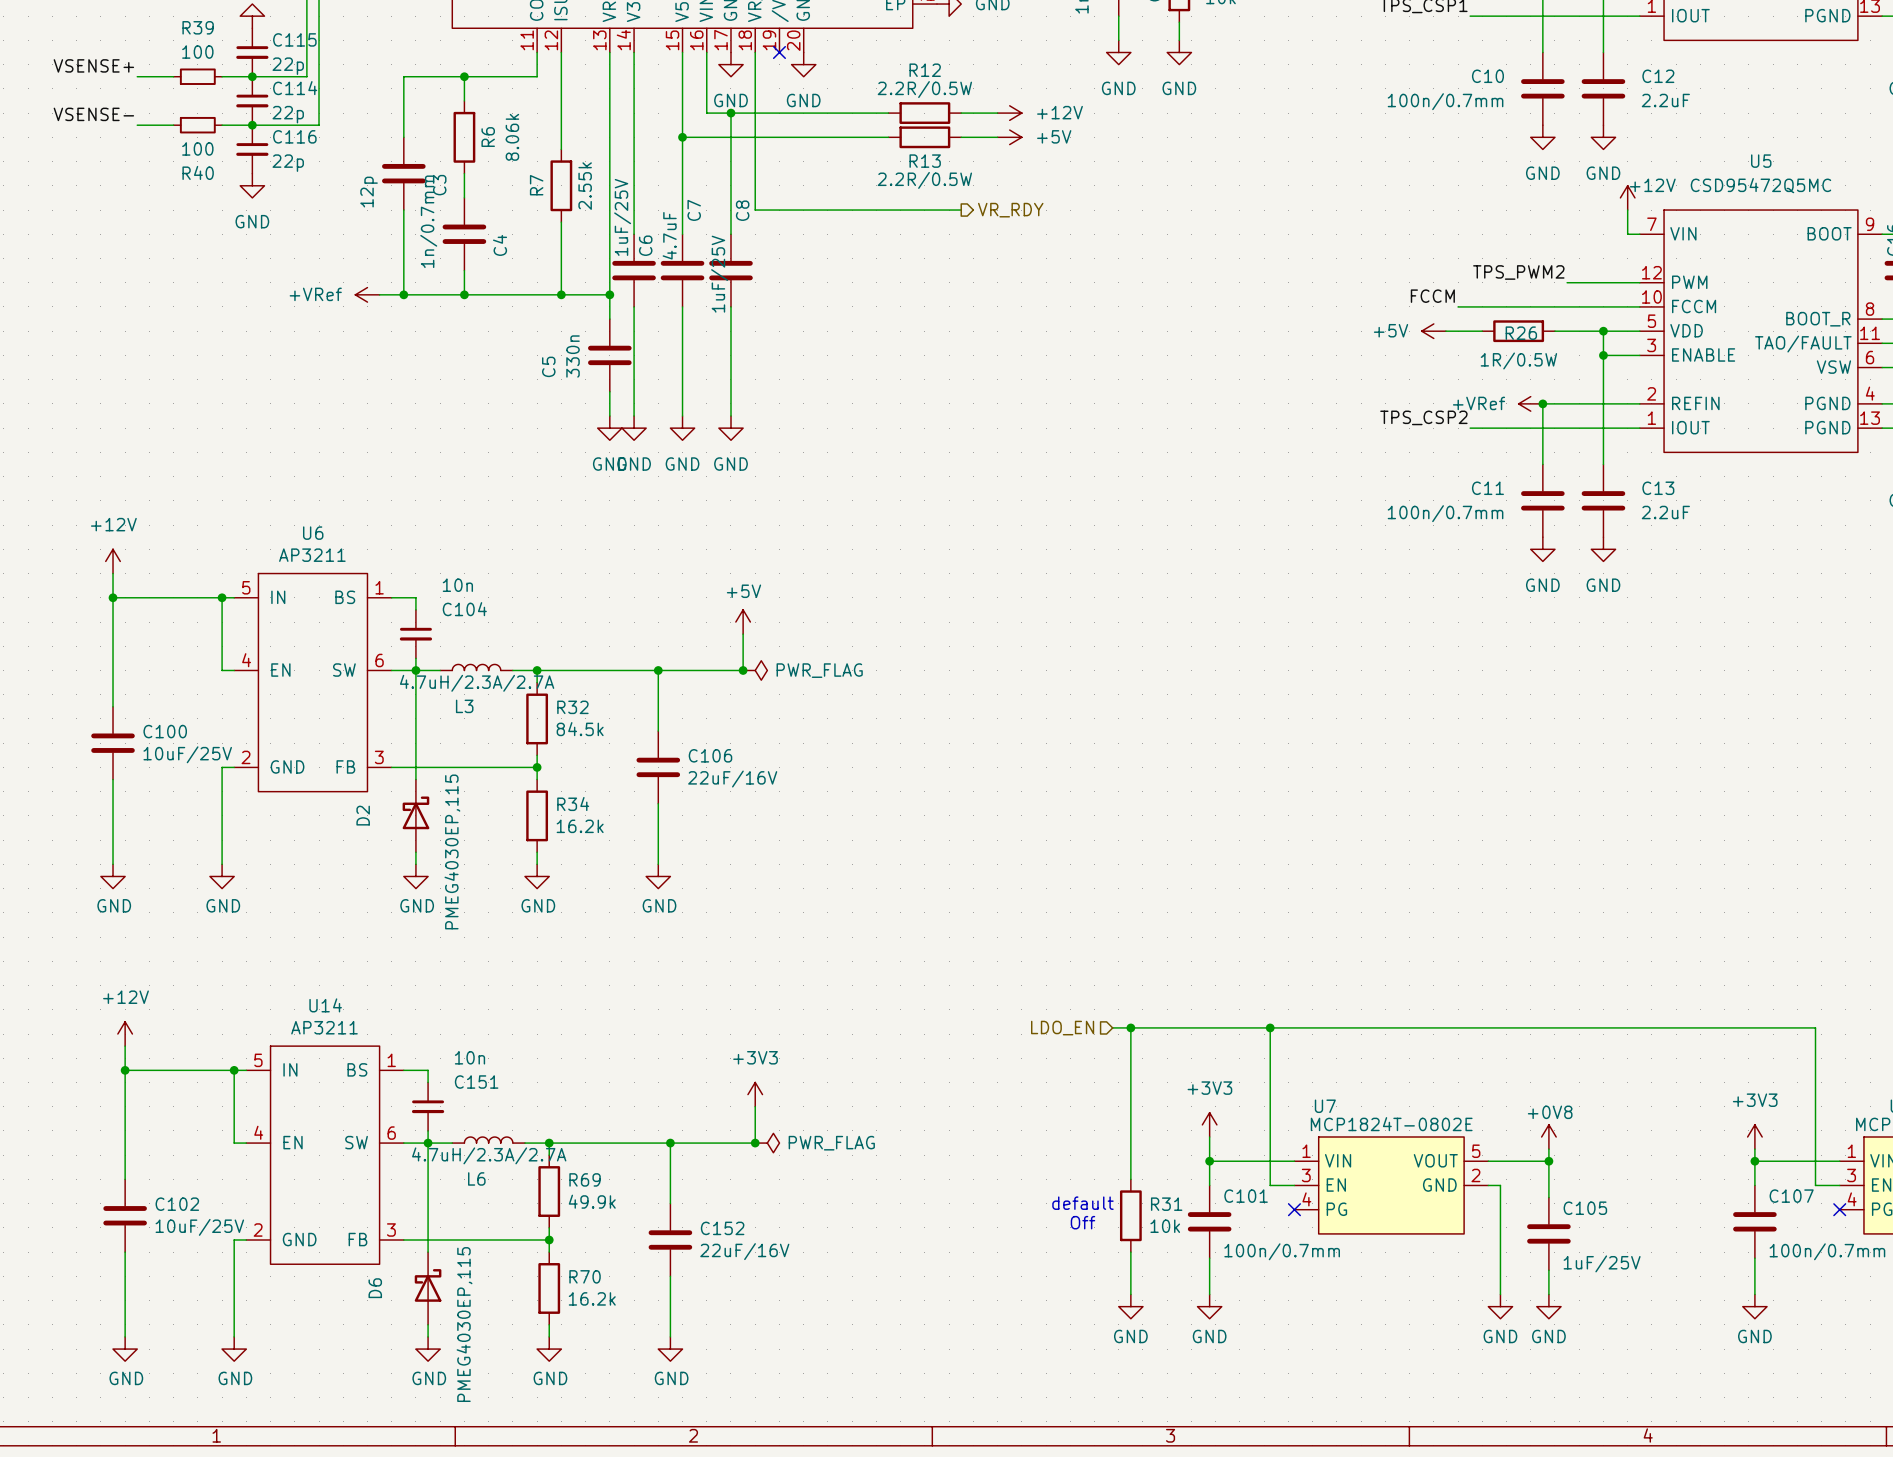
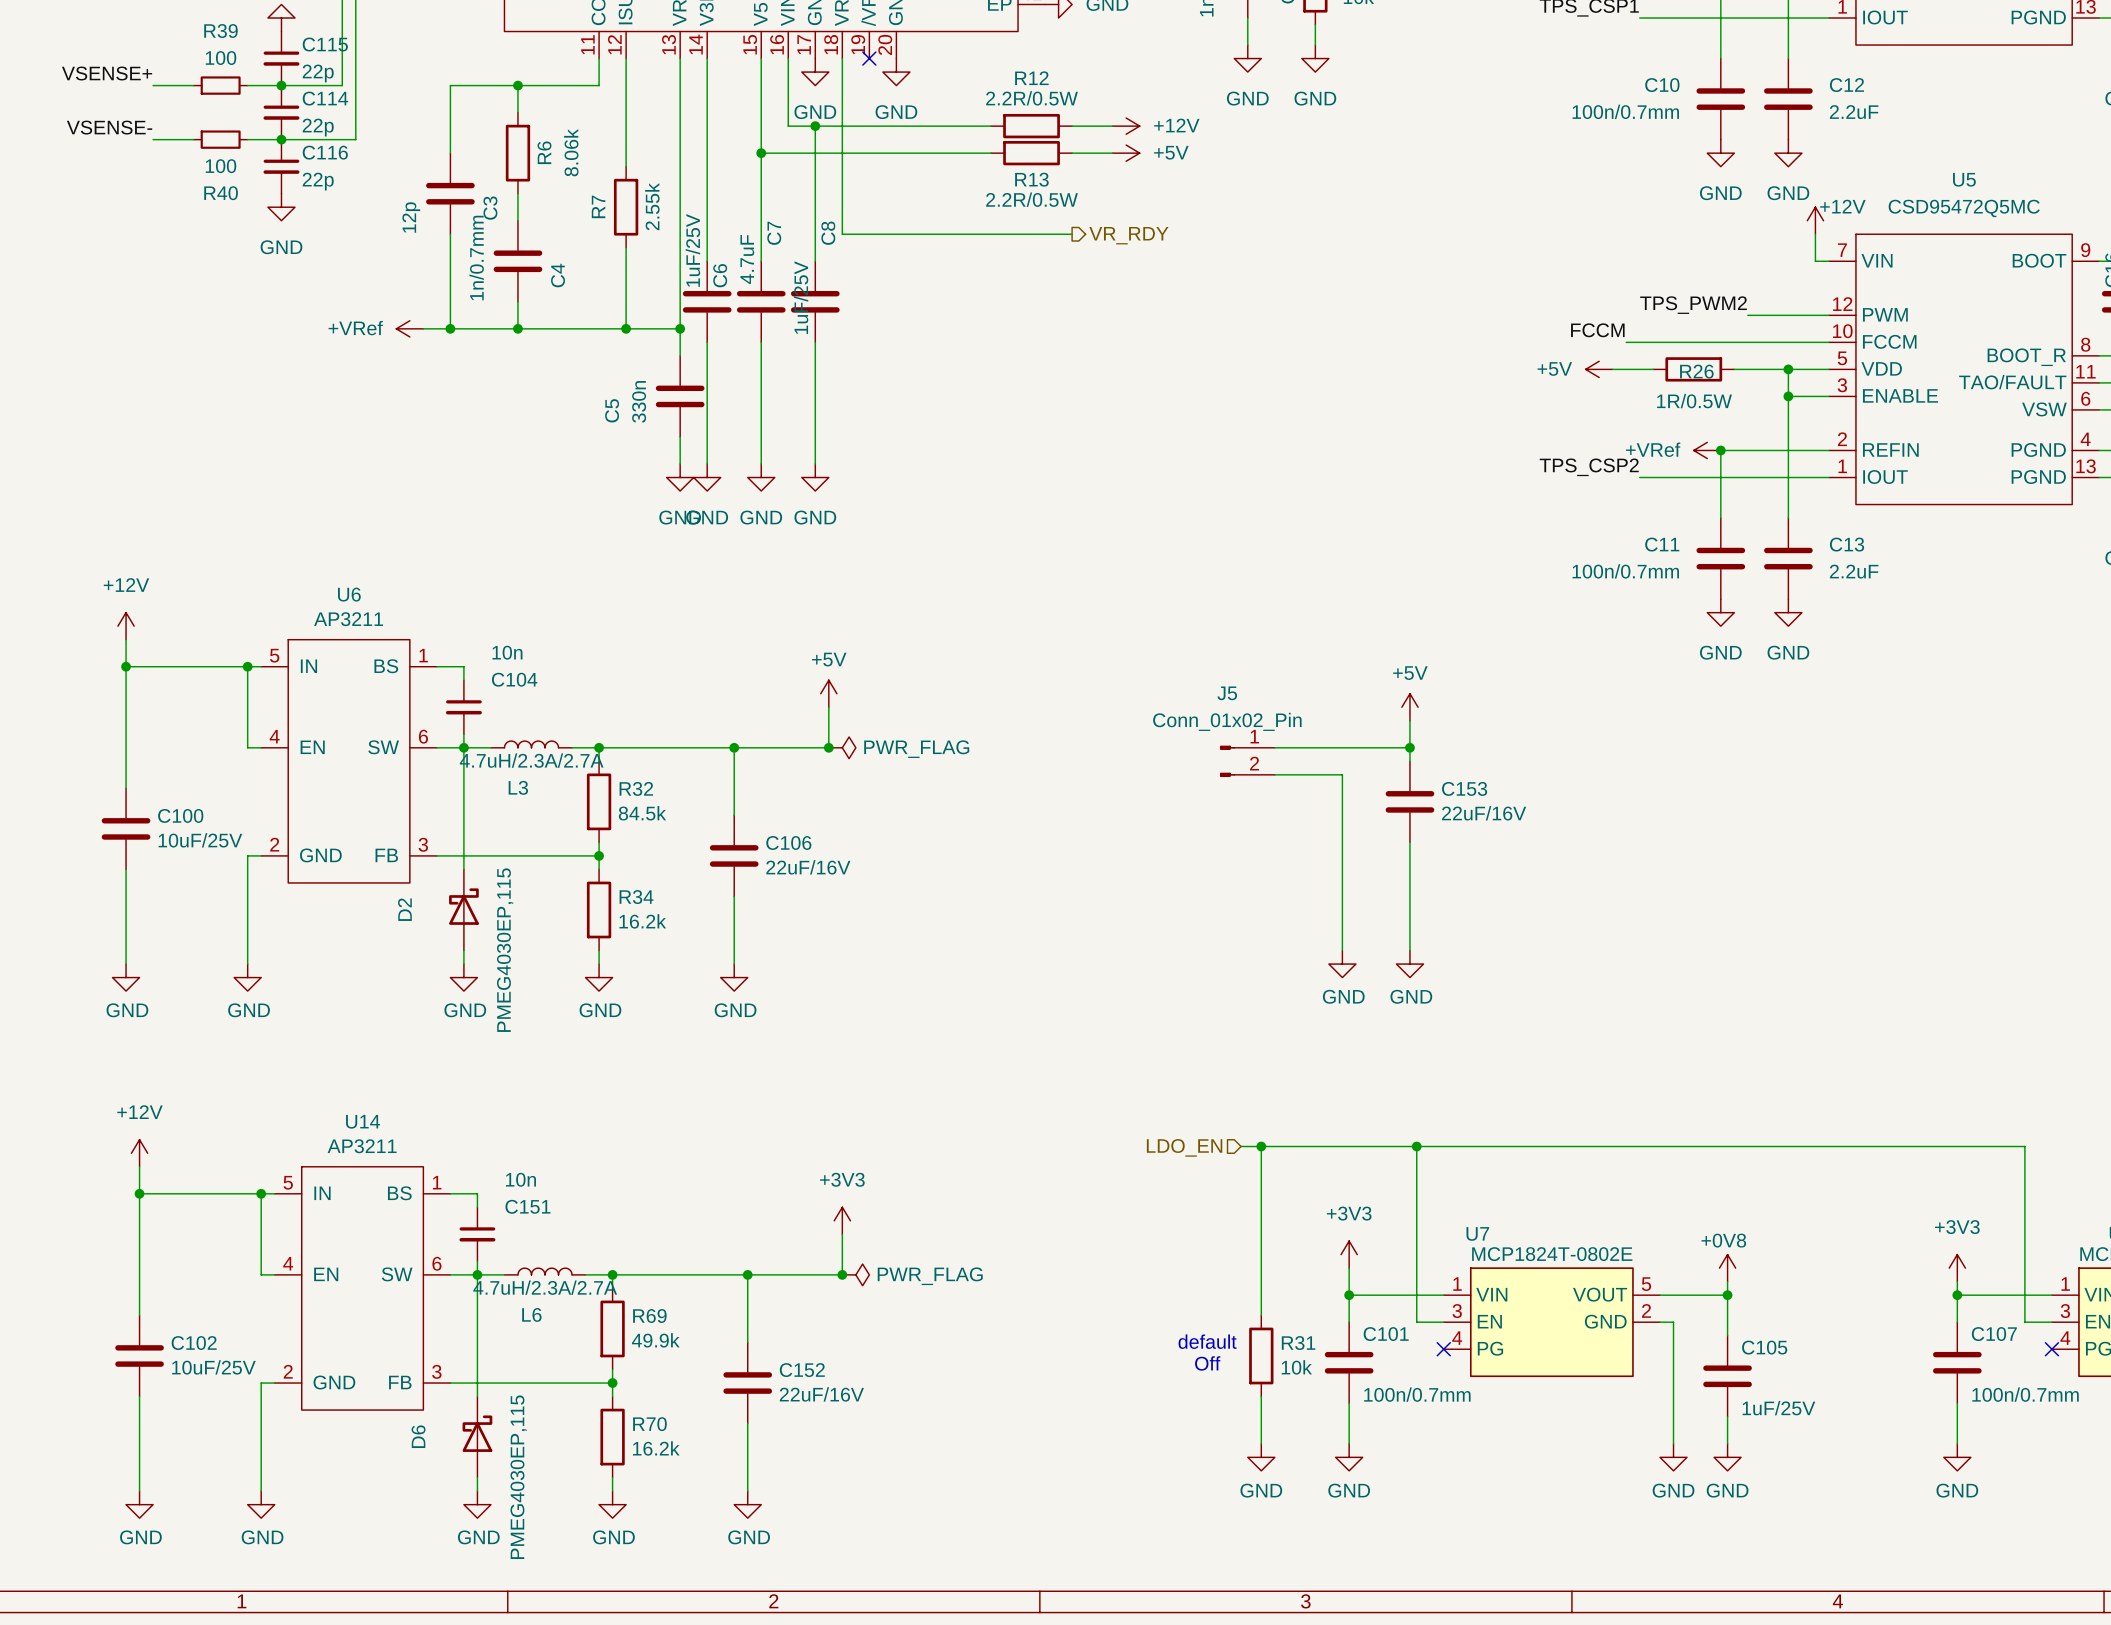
power symbol: none -> +5V (1409, 707)
wire: none -> (1409, 720) (1409, 761)
wire: none -> (1274, 747) (1409, 747)
junction: none -> (1409, 747)
J5: none -> Conn_01x02_Pin (1247, 761)
wire: none -> (1274, 774) (1342, 774) (1342, 950)
C153: none -> 22uF/16V (1409, 801)
wire: none -> (1409, 842) (1409, 950)
power symbol: none -> GND (1342, 964)
power symbol: none -> GND (1409, 964)

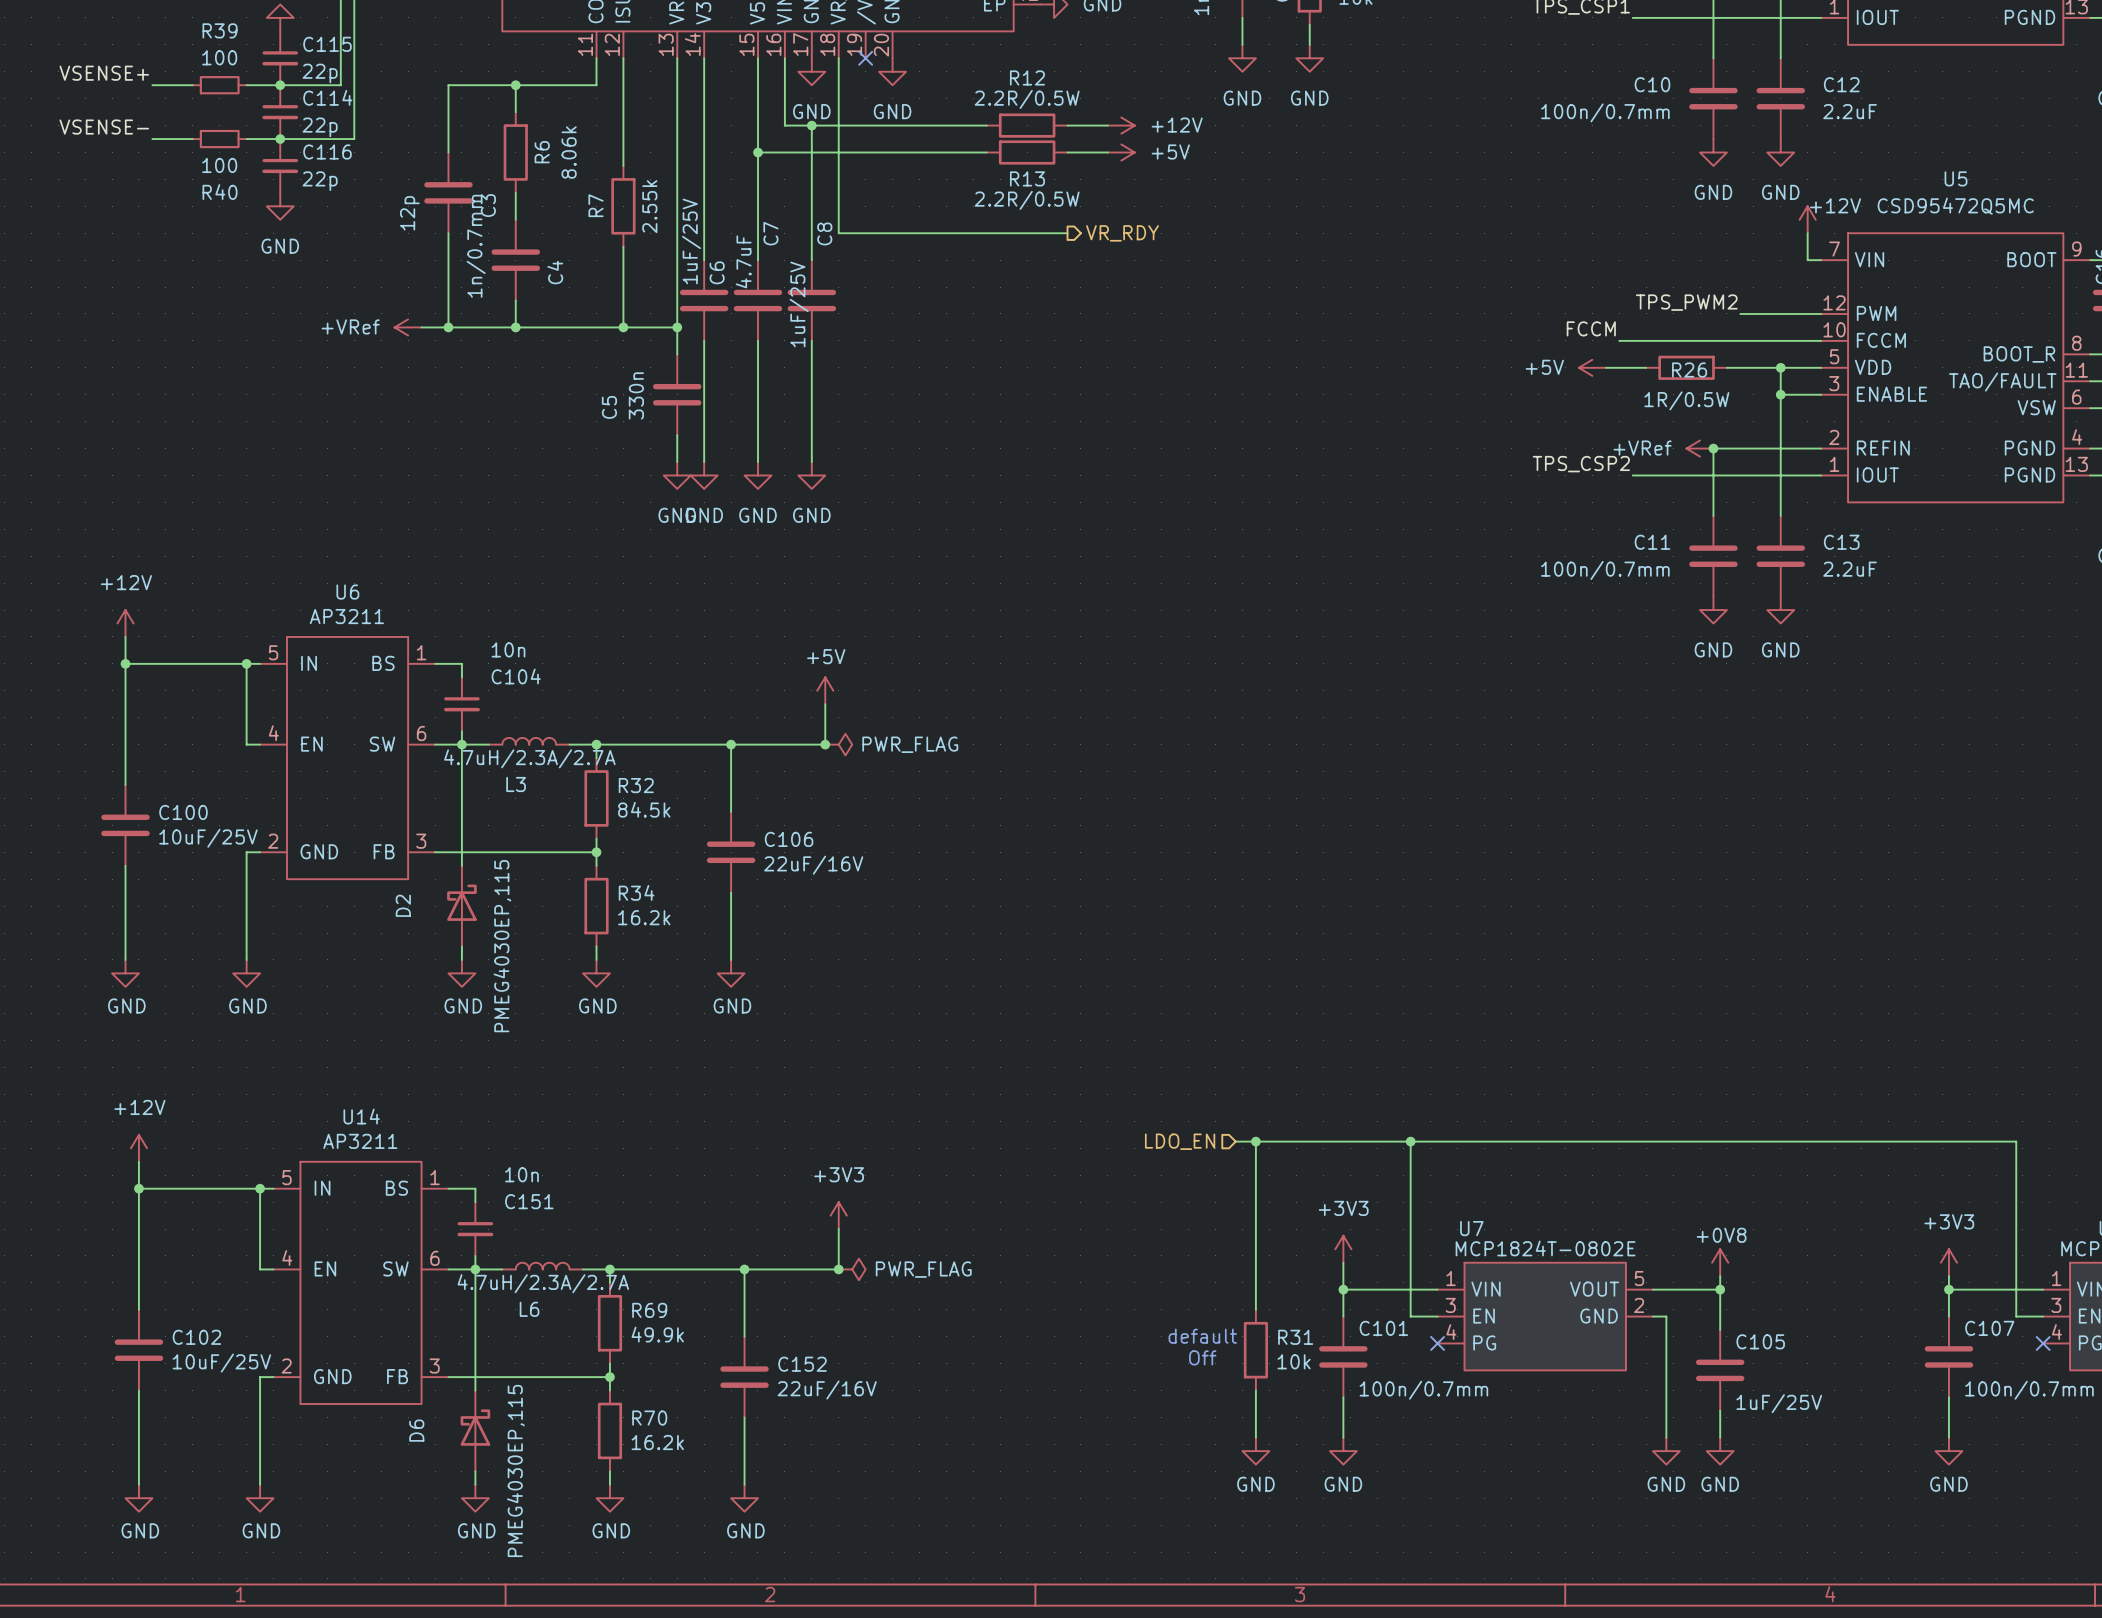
power symbol: +5V (1409, 707) -> none
wire: (1409, 720) (1409, 761) -> none
wire: (1274, 747) (1409, 747) -> none
junction: (1409, 747) -> none
J5: Conn_01x02_Pin (1247, 761) -> none
wire: (1274, 774) (1342, 774) (1342, 950) -> none
C153: 22uF/16V (1409, 801) -> none
wire: (1409, 842) (1409, 950) -> none
power symbol: GND (1342, 964) -> none
power symbol: GND (1409, 964) -> none

